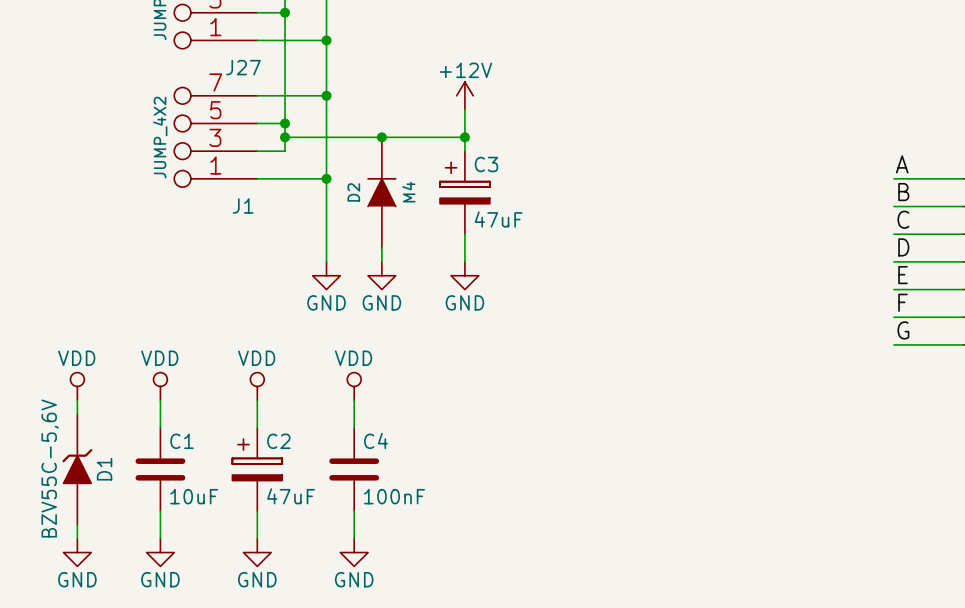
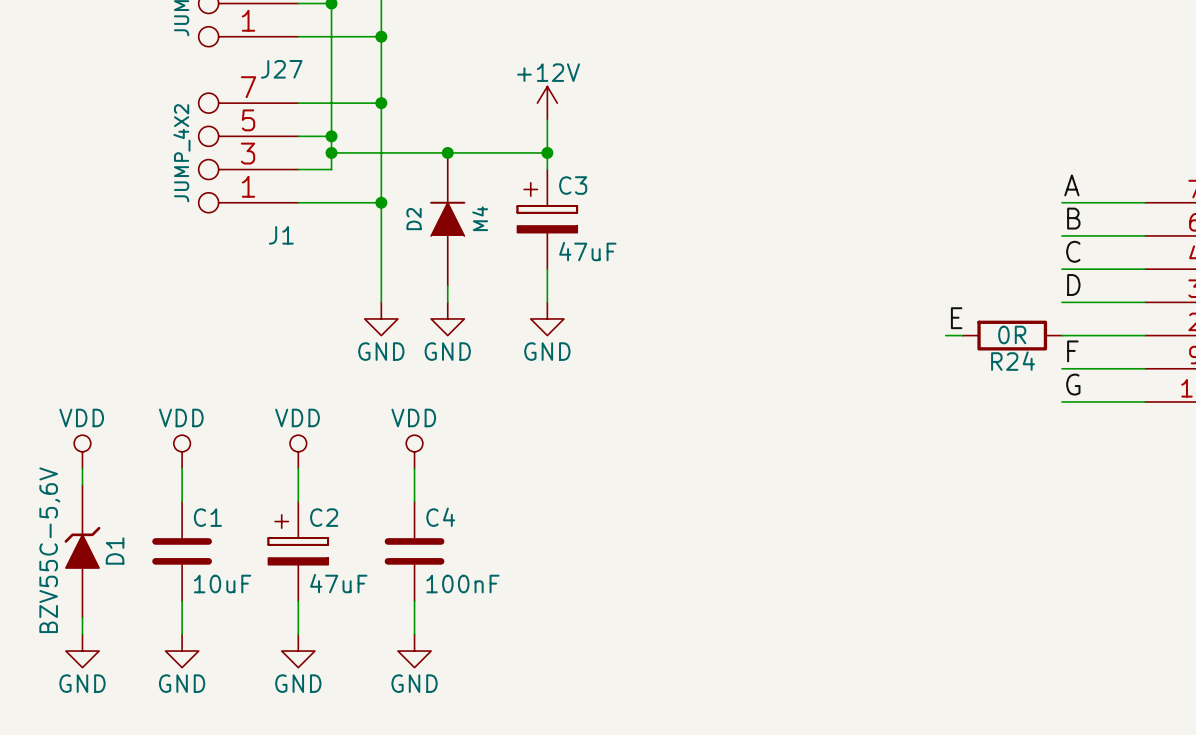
label position: E (902, 275) -> E (956, 318)
wire: none -> (945, 335) (962, 335)
R24: none -> 0R (1012, 335)

